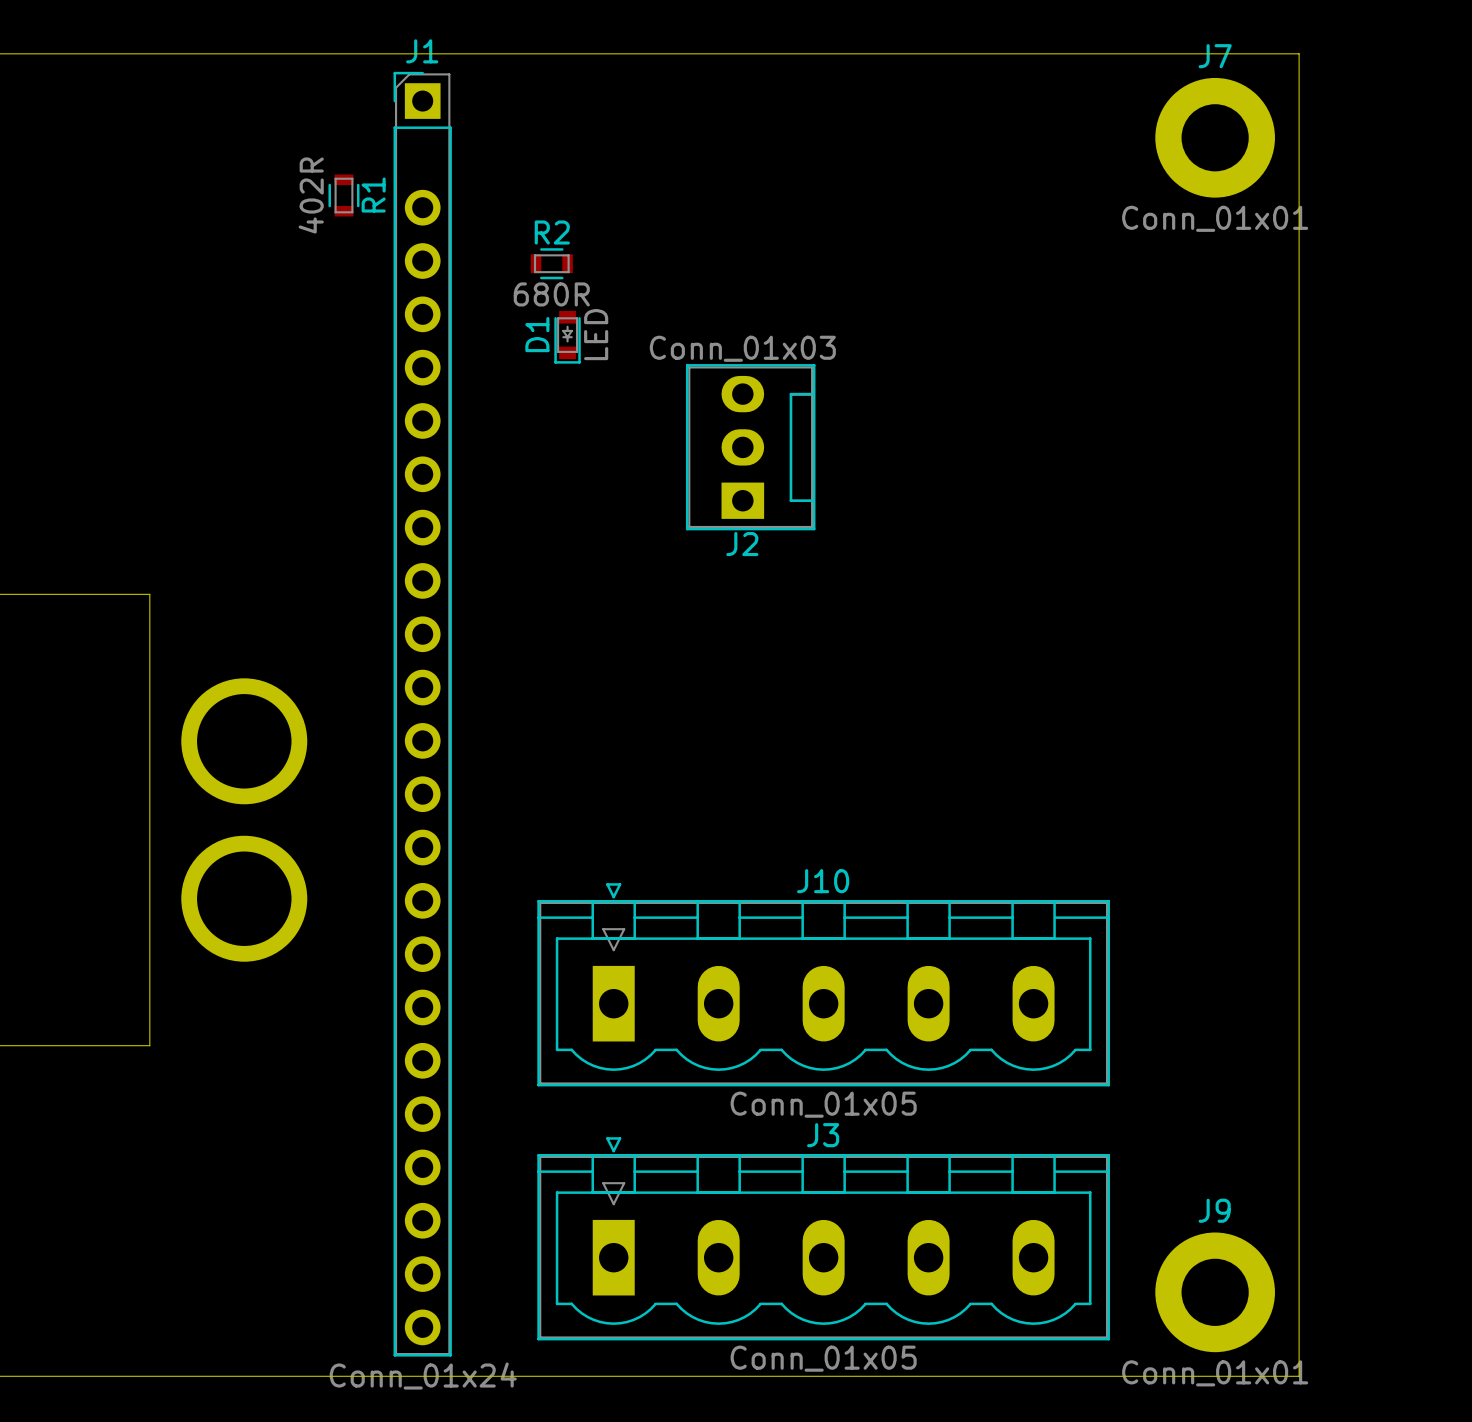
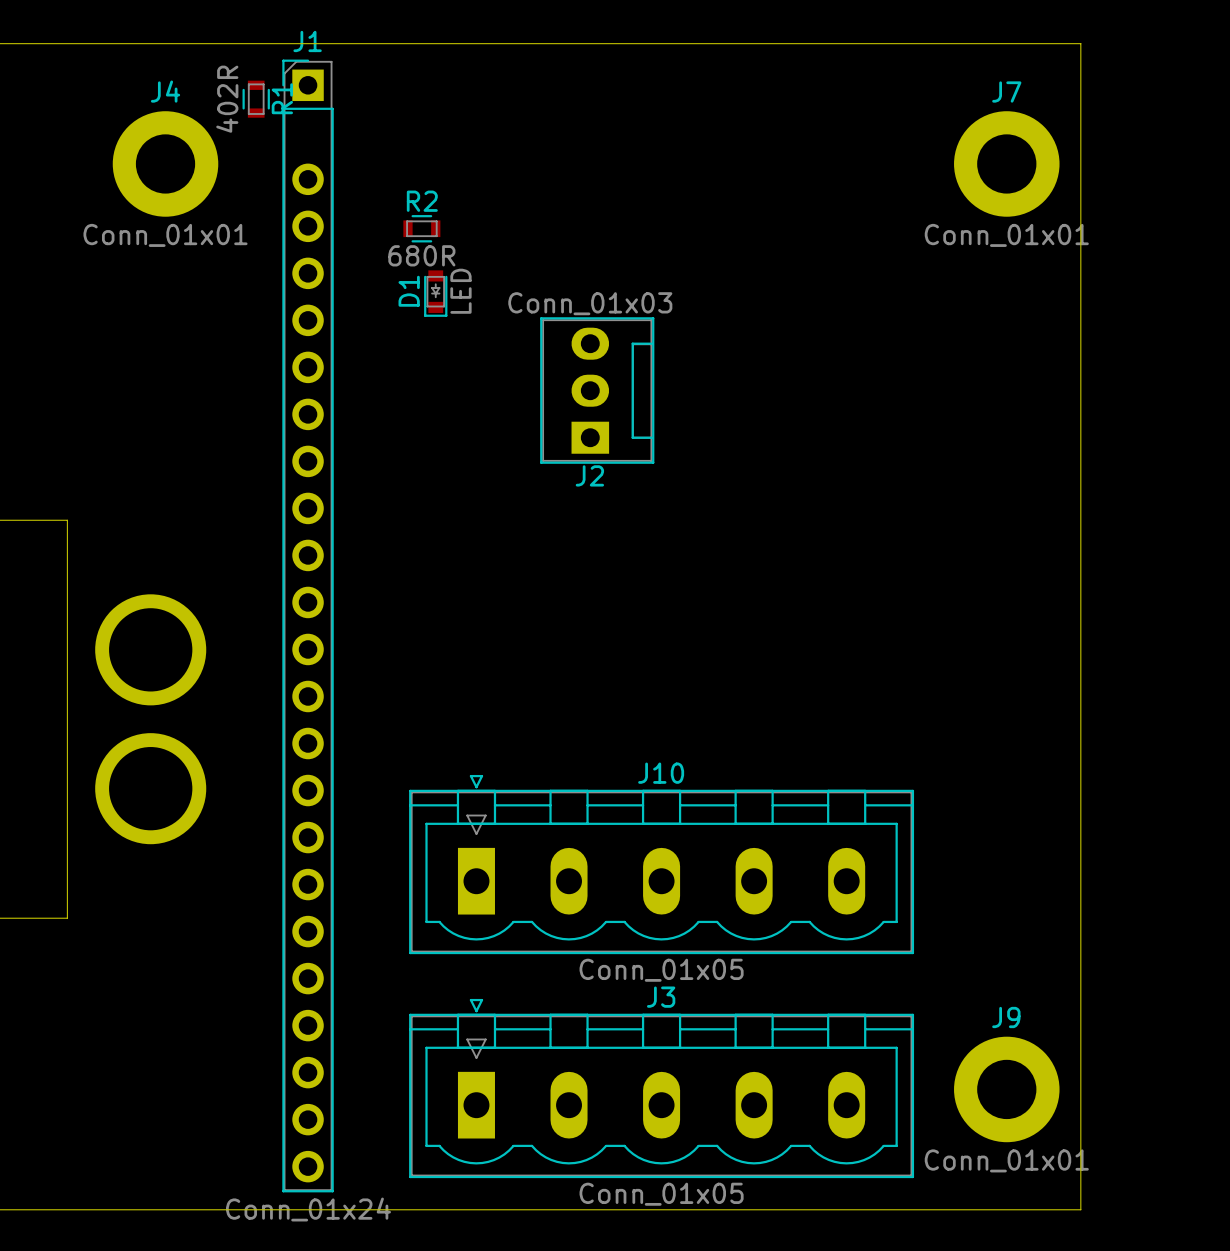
J7 position: (1215, 137) -> (1006, 163)
J4: none -> Conn_01x01 (165, 163)
R1 position: (343, 195) -> (256, 99)
J9 position: (1215, 1292) -> (1006, 1089)

